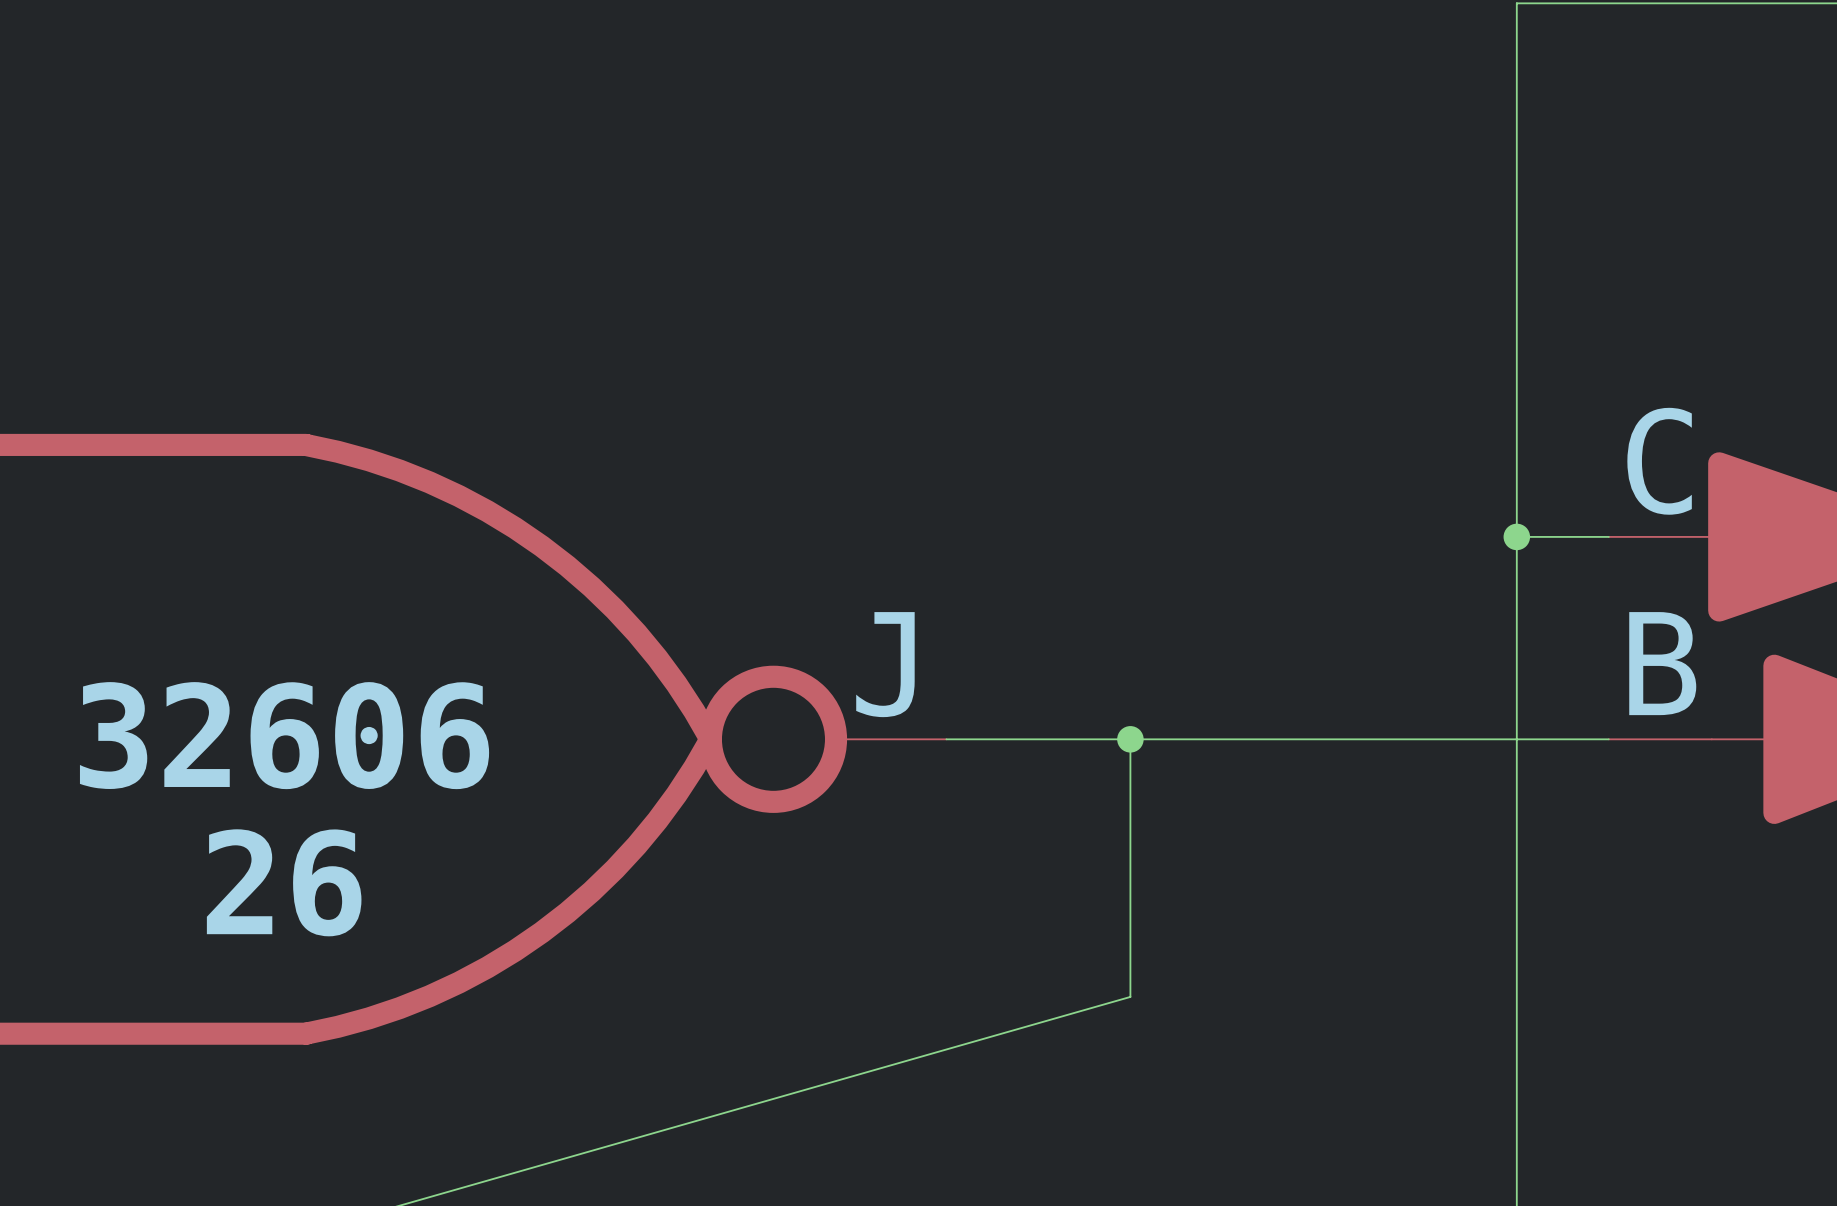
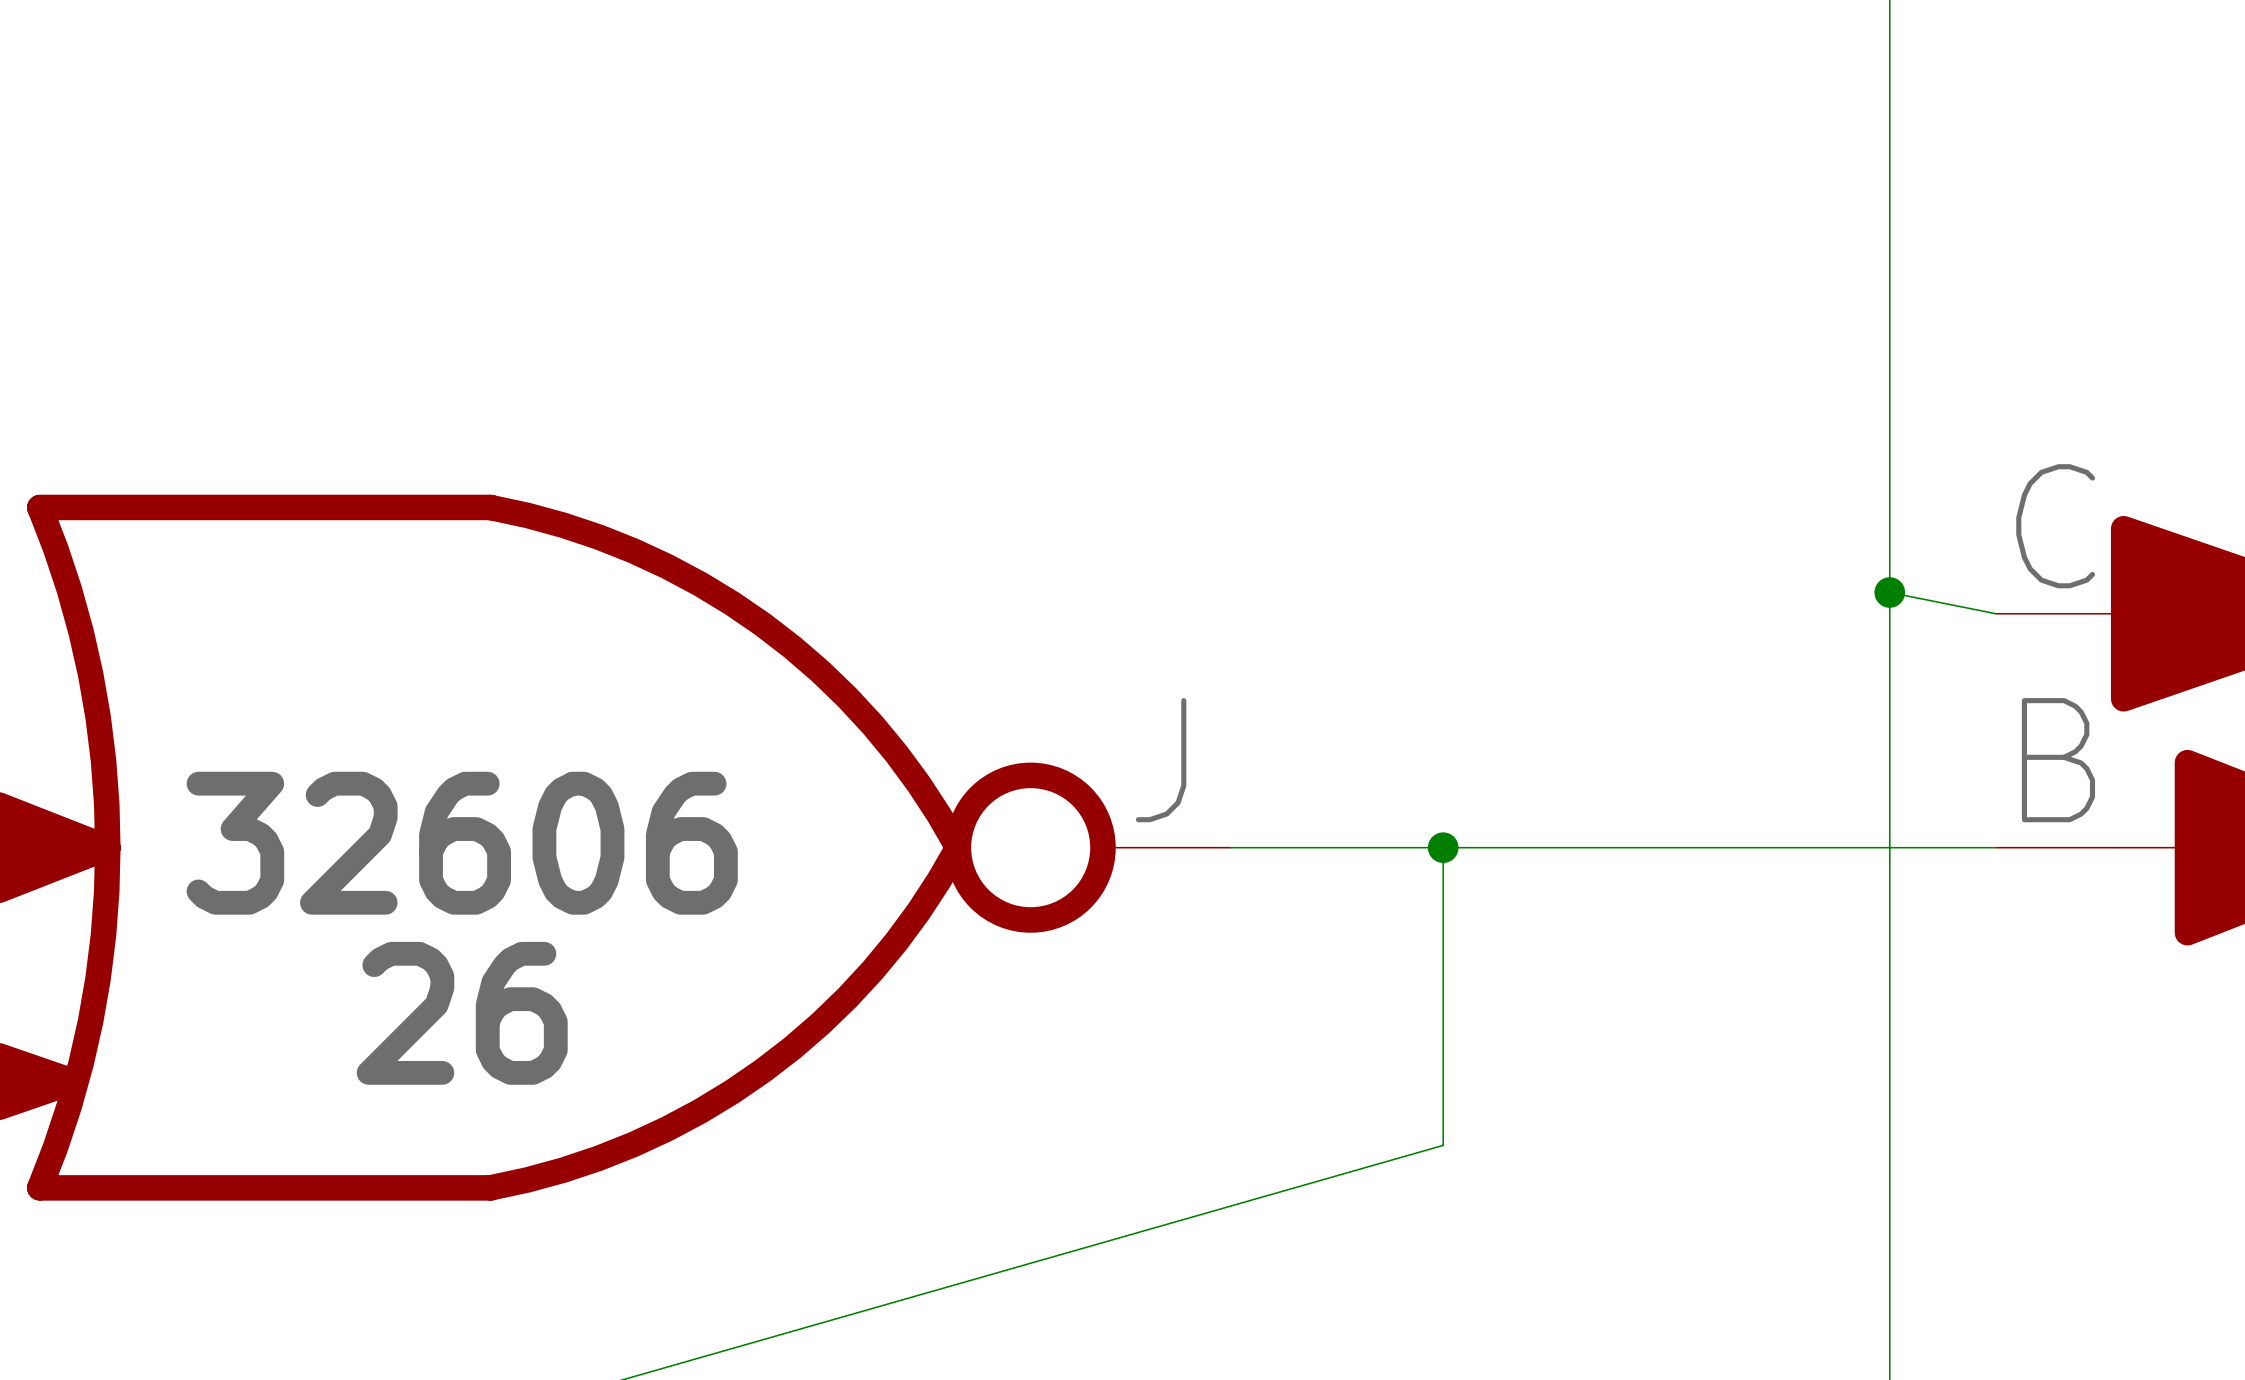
wire: (1516, 536) (1608, 536) -> (1889, 592) (1996, 613)
junction position: (1516, 536) -> (1889, 592)

